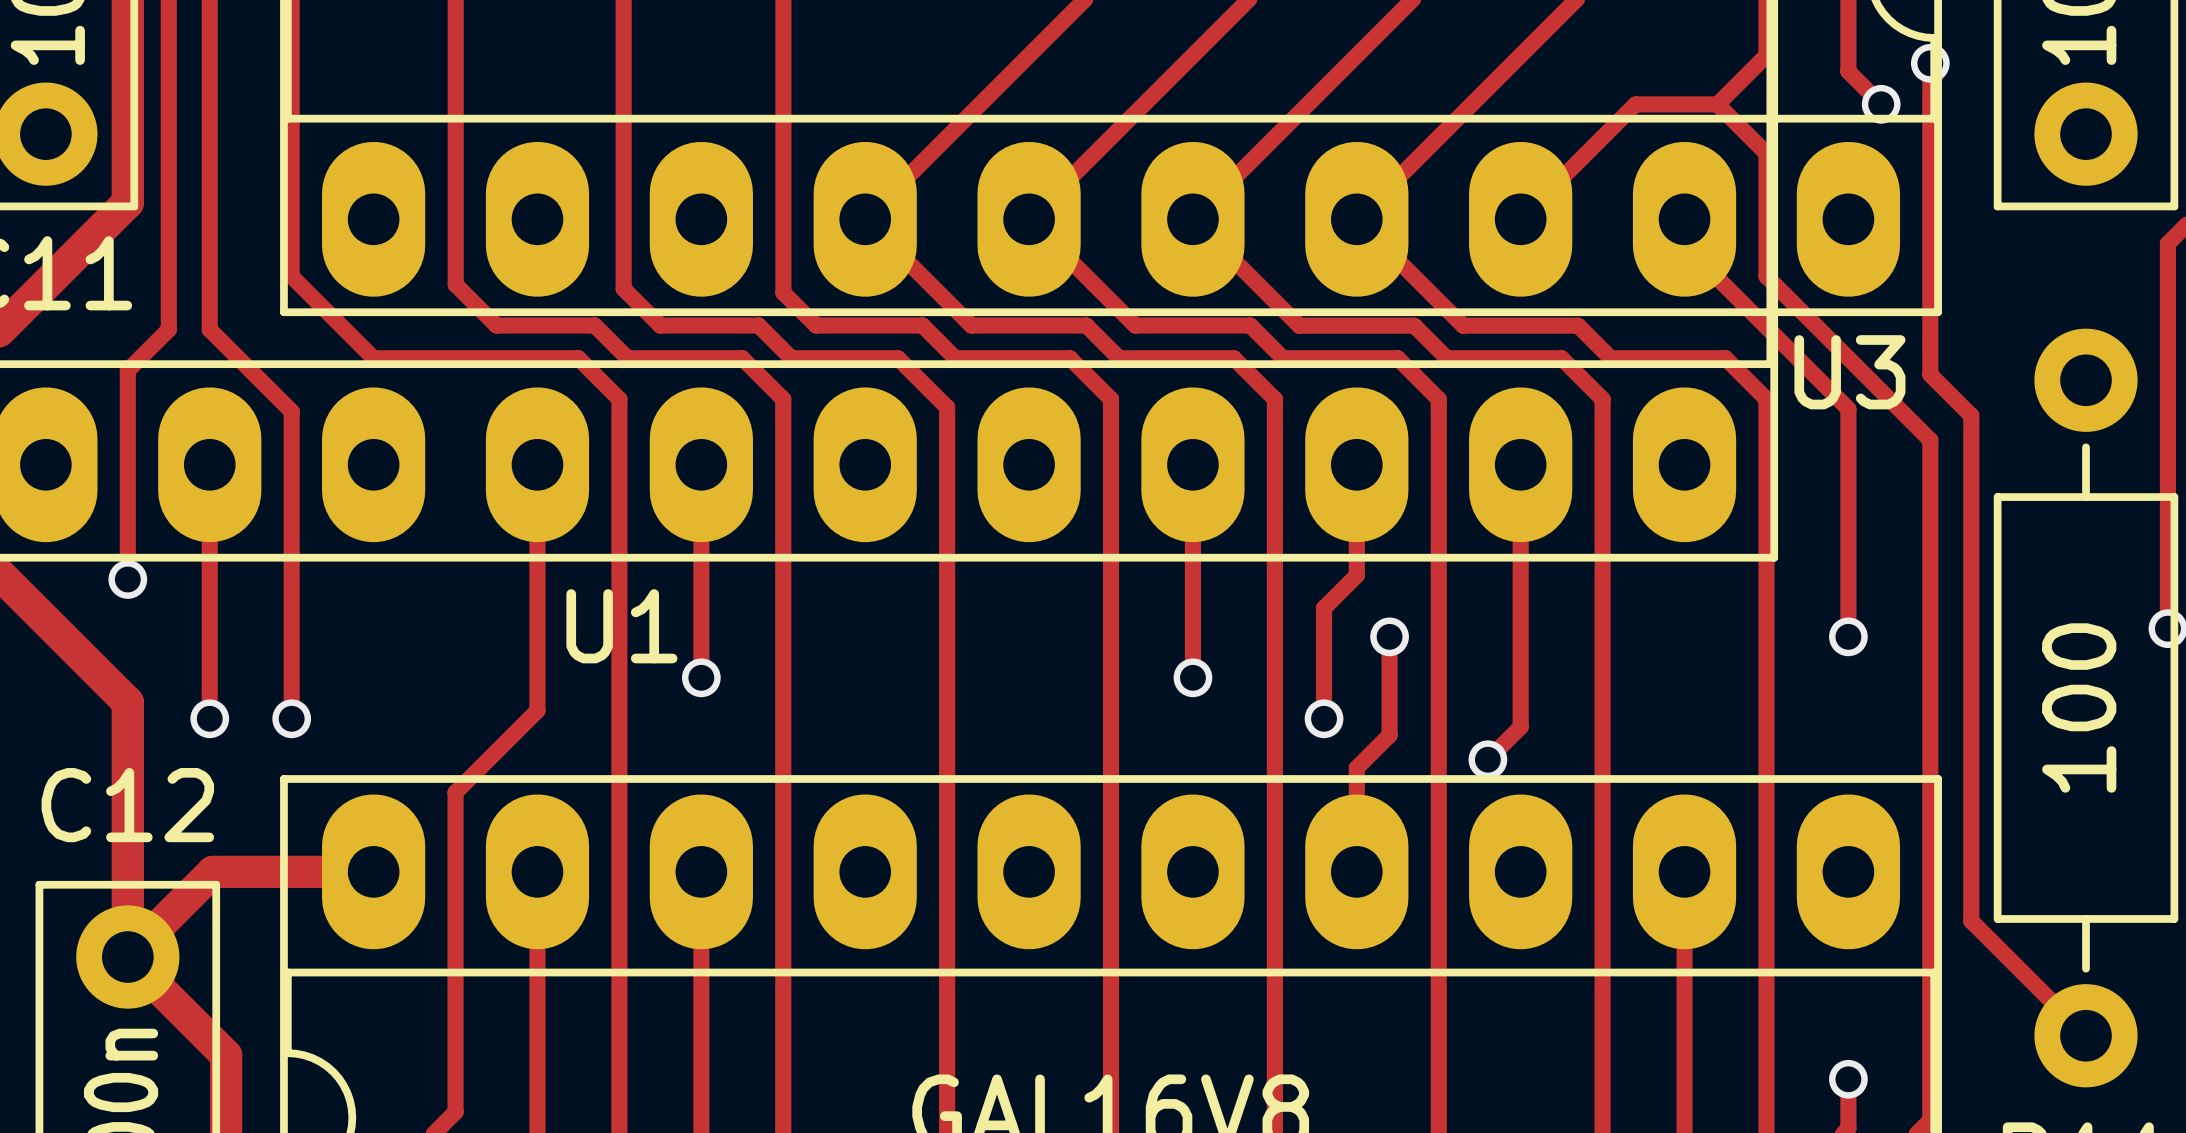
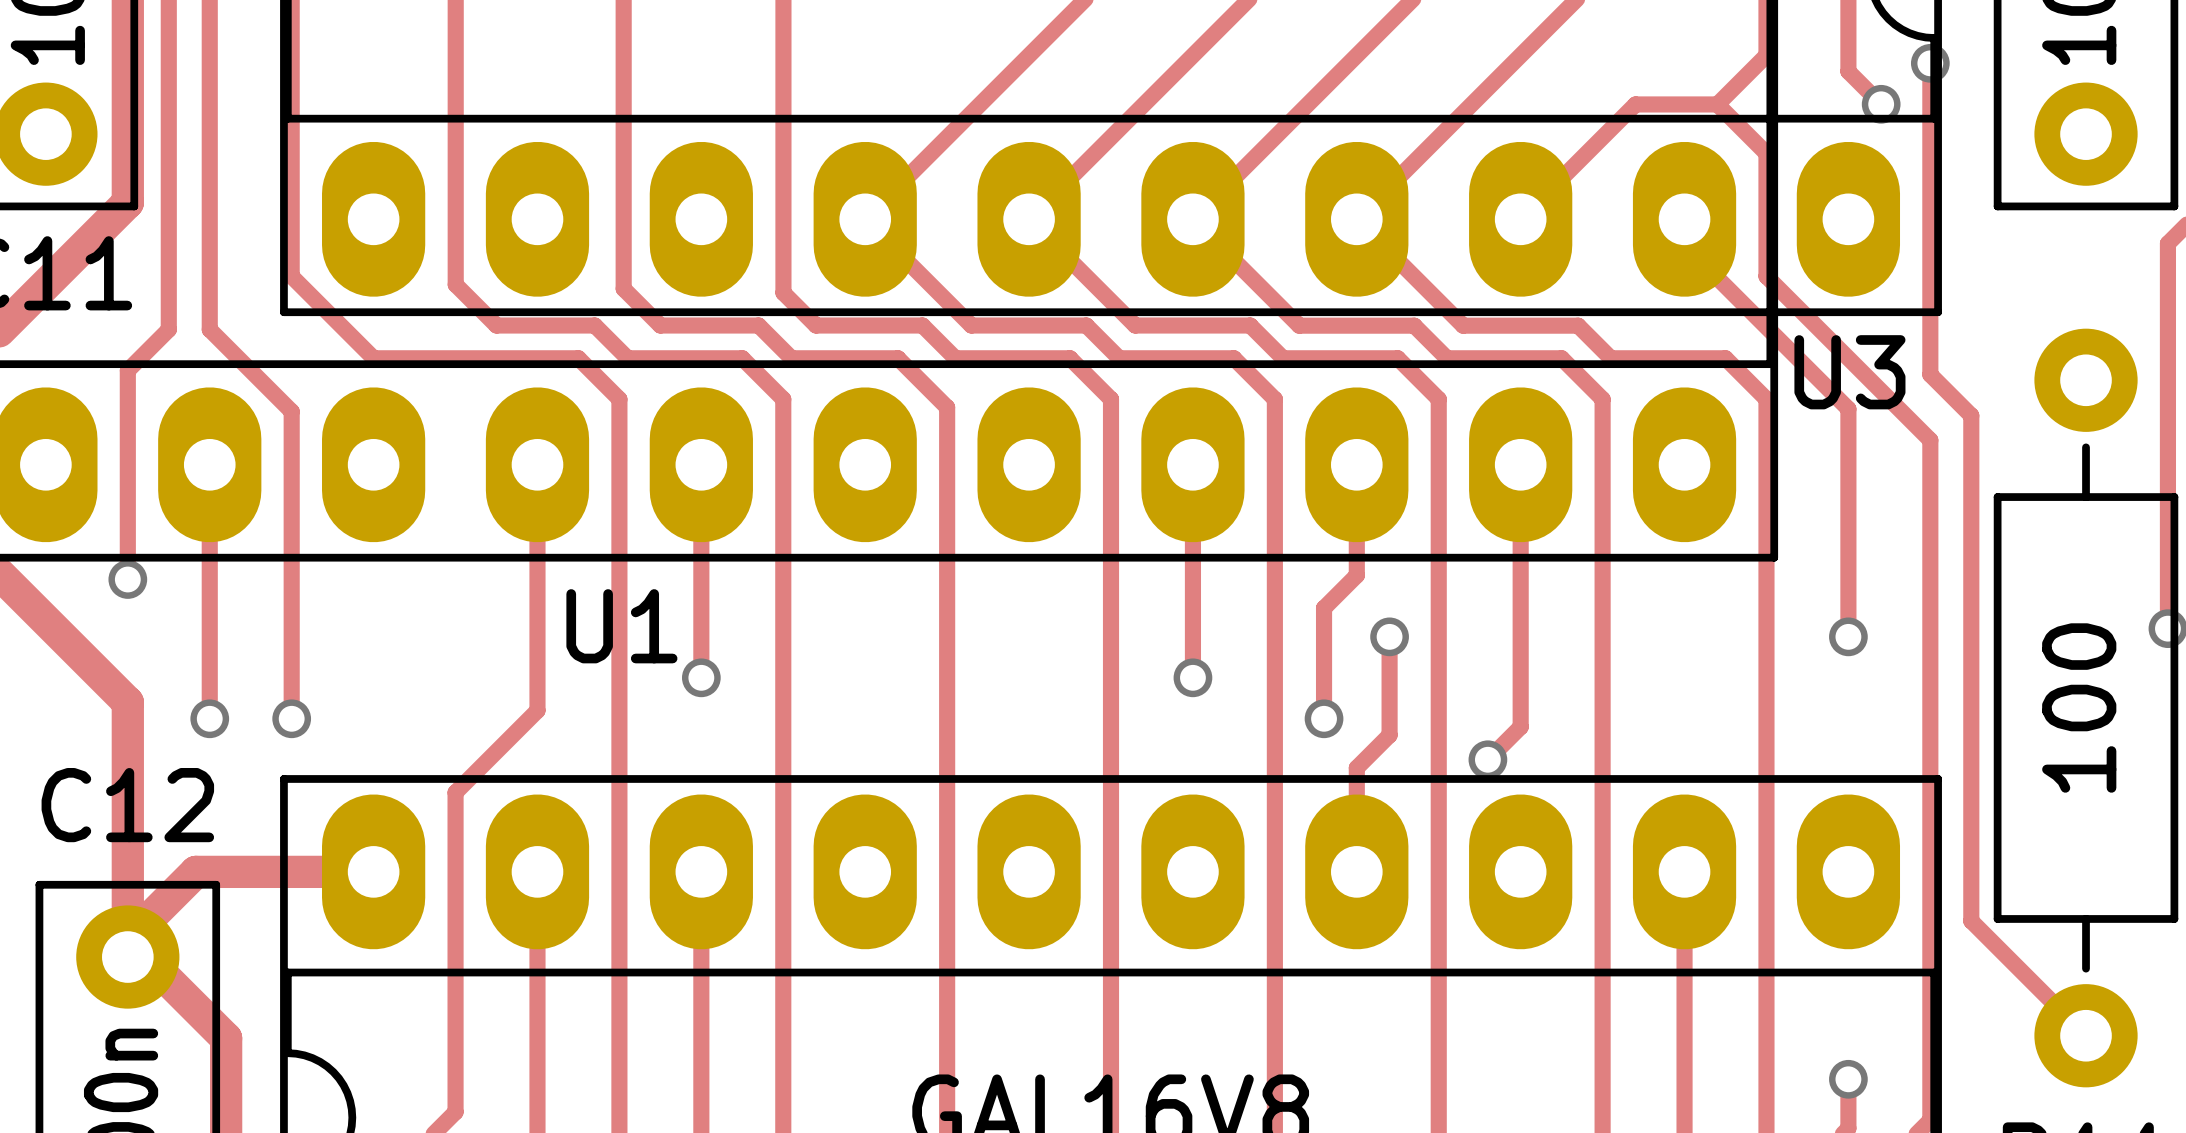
track: (212, 871) (127, 957) (226, 1055) -> (212, 871) (195, 871) (127, 940) (226, 1038) (226, 1055)

